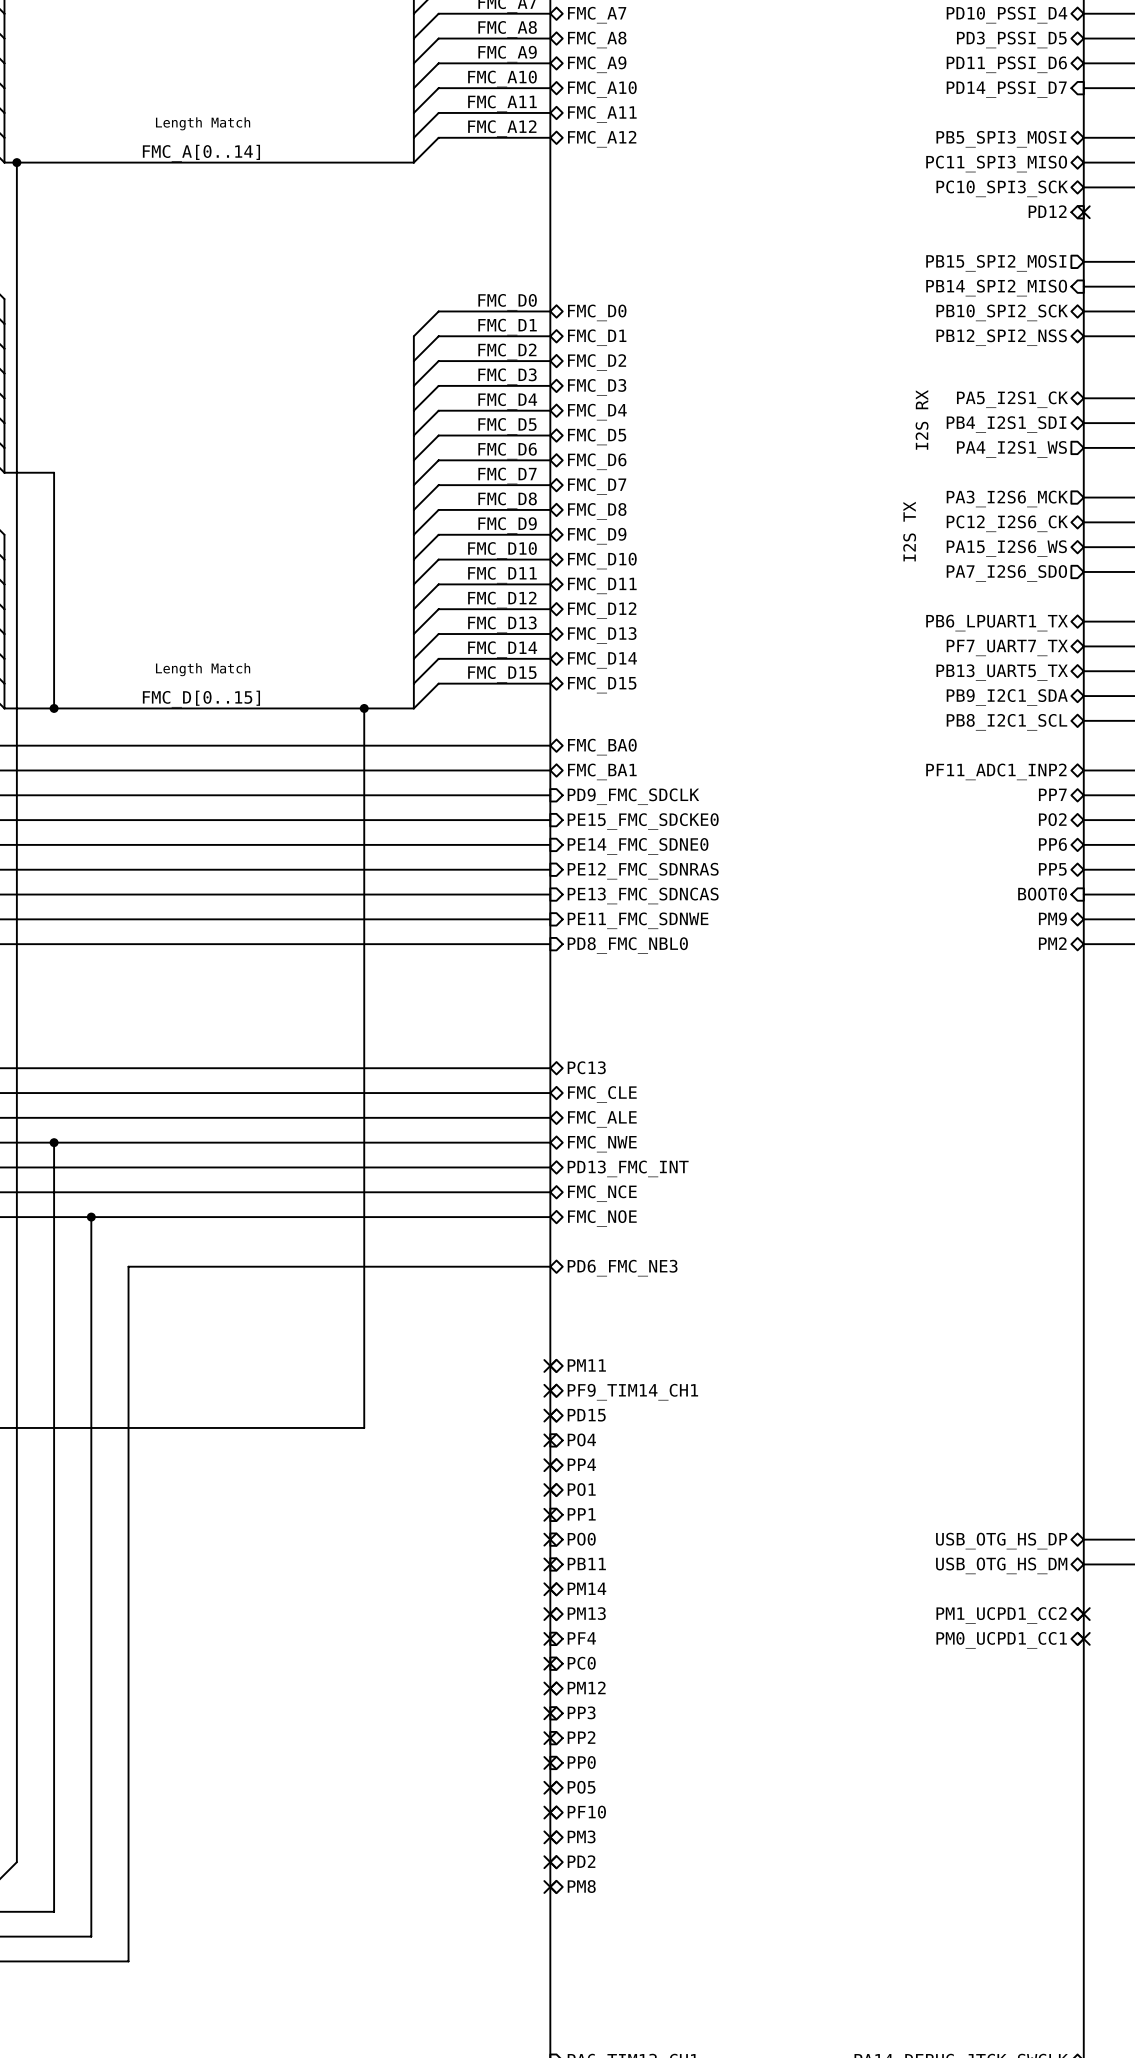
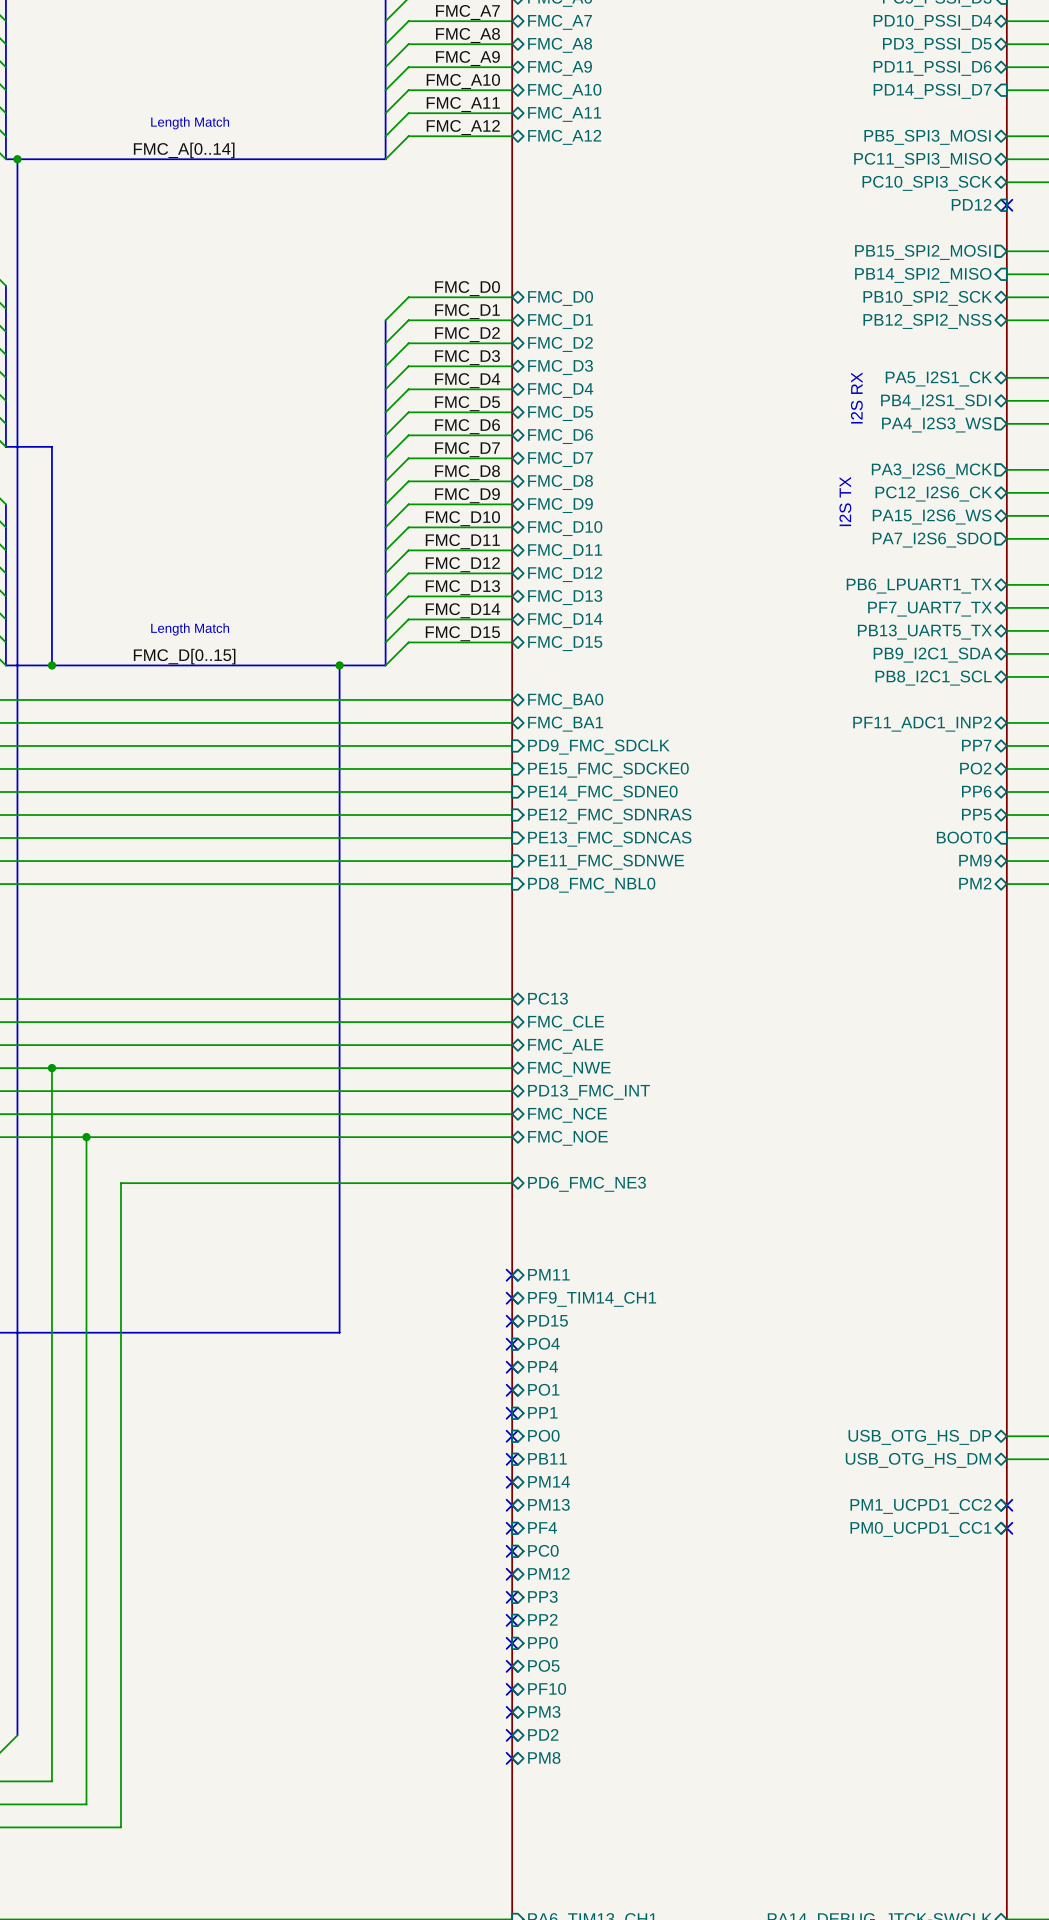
sheet pin: PA4_I2S1_WS (1011, 449) -> PA4_I2S3_WS (936, 424)

